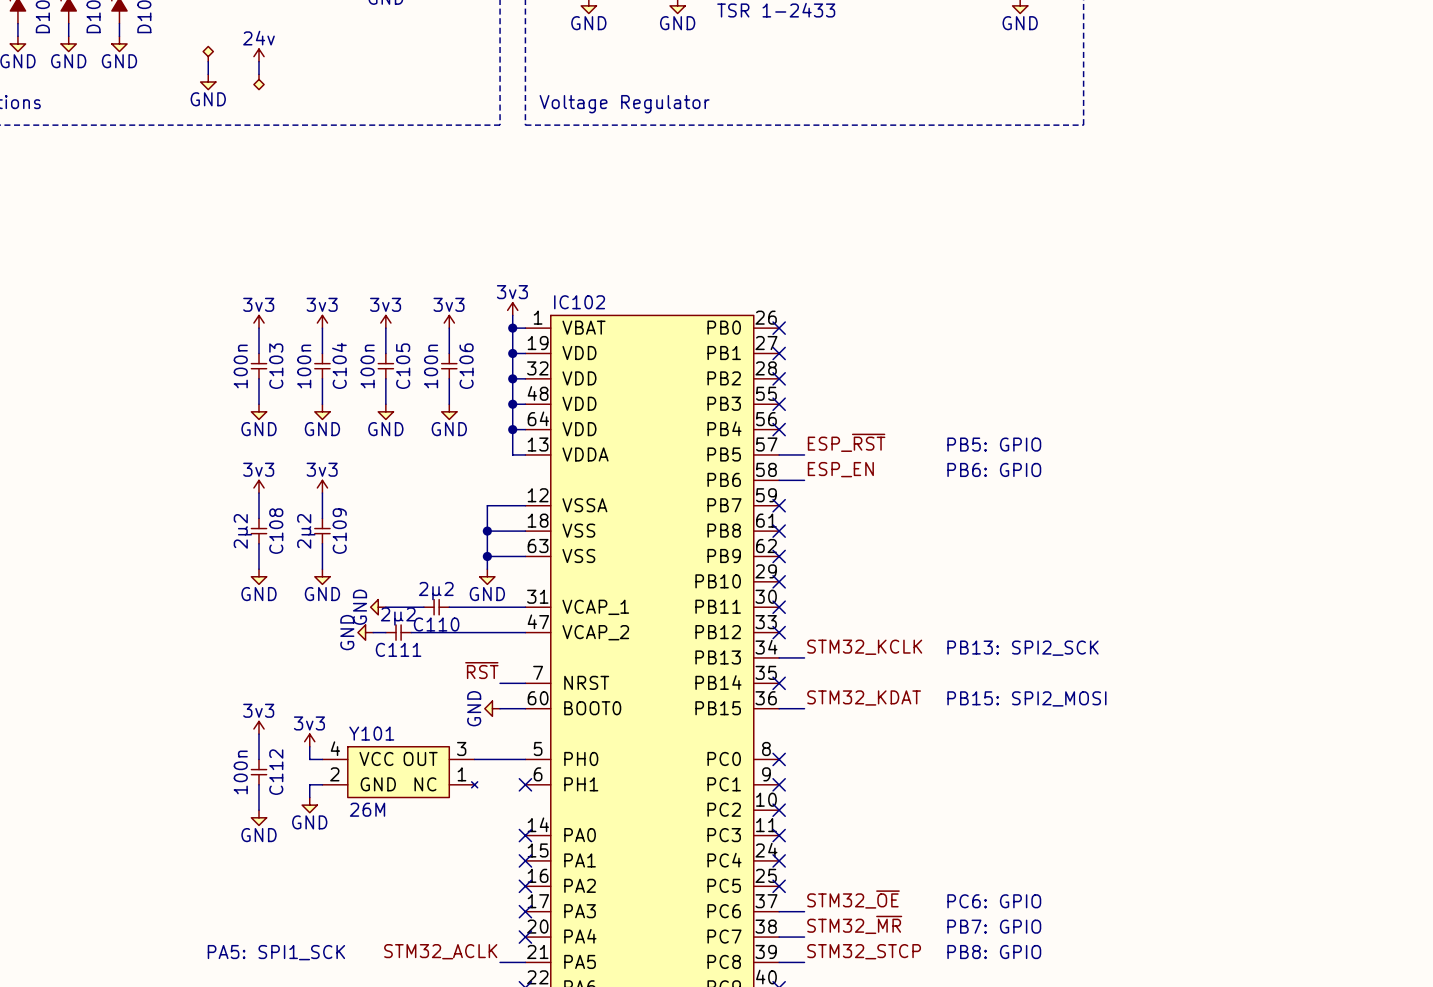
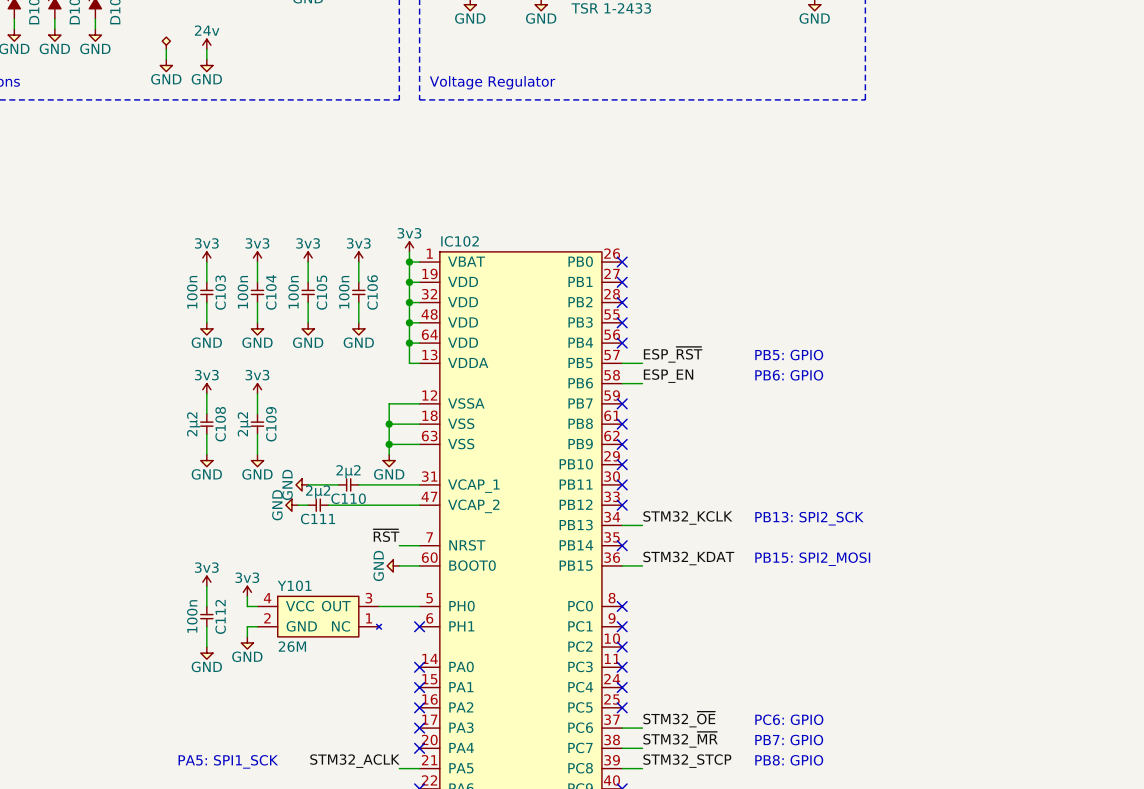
power symbol shape: [253, 74, 265, 90] -> [200, 59, 213, 72]
power symbol text: none -> GND (206, 79)

